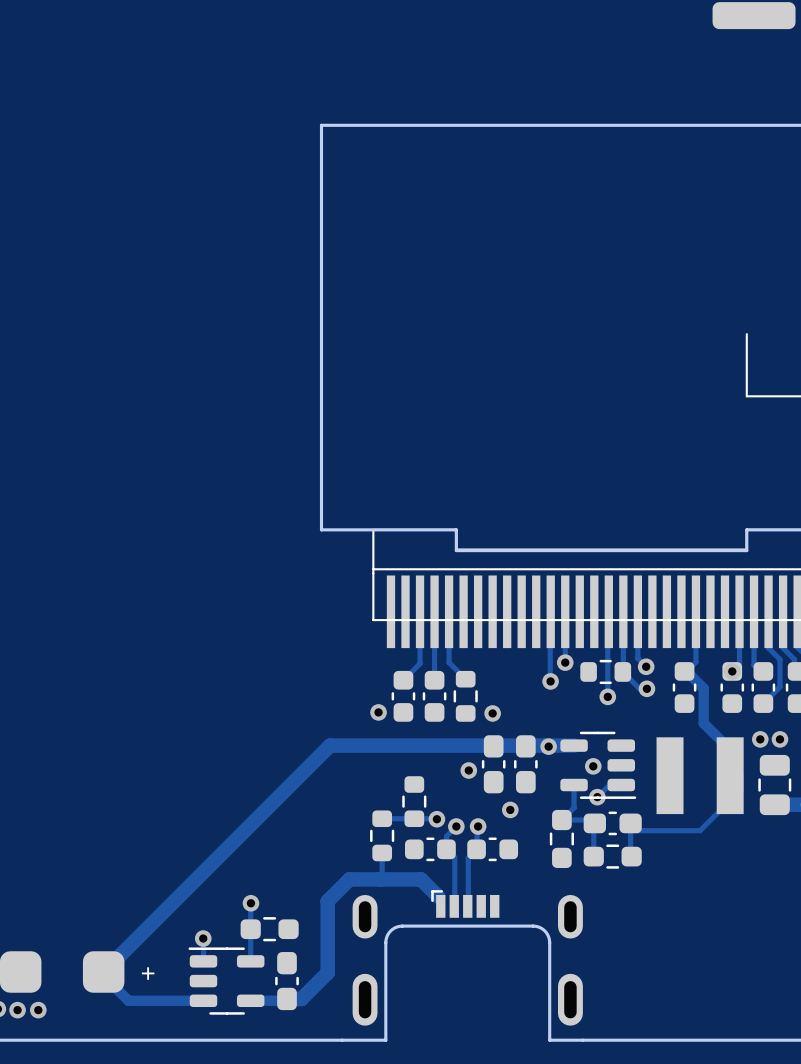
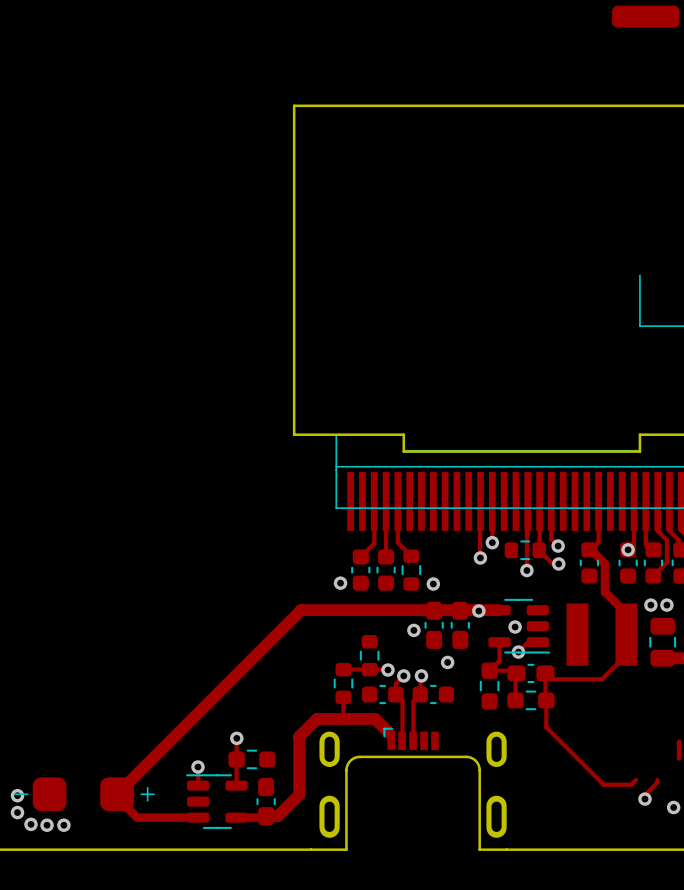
track: none -> (546, 700) (546, 727) (603, 784) (631, 784) (636, 780)
track: none -> (679, 741) (678, 758)
track: none -> (657, 780) (657, 782) (644, 794) (644, 799)
via: none -> (644, 799)
via: none -> (673, 807)

